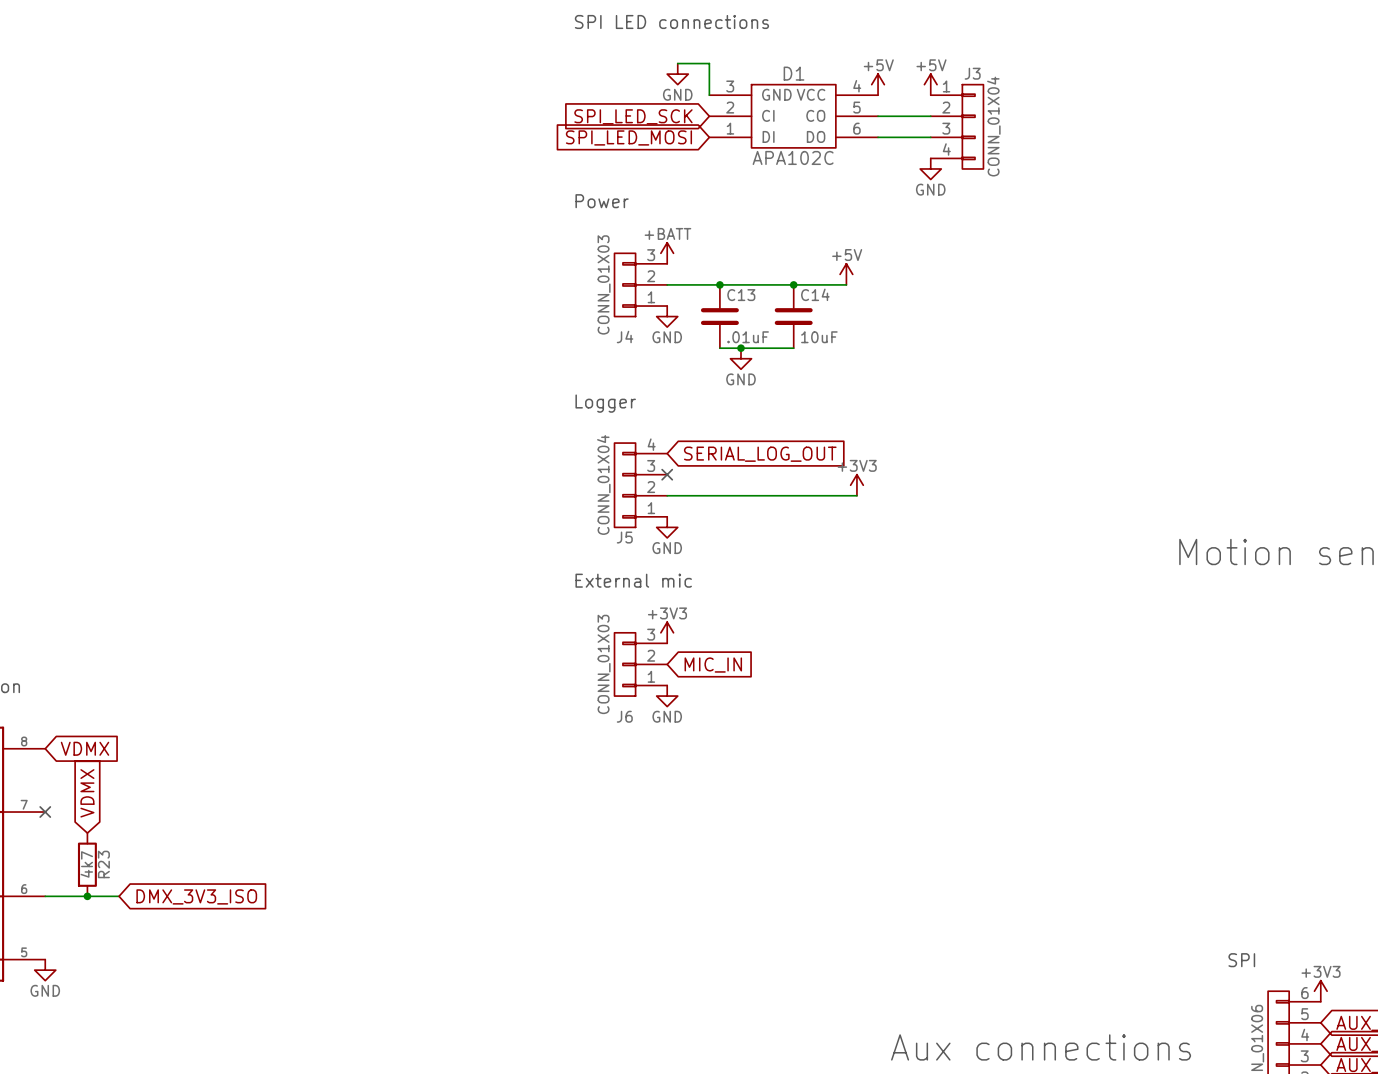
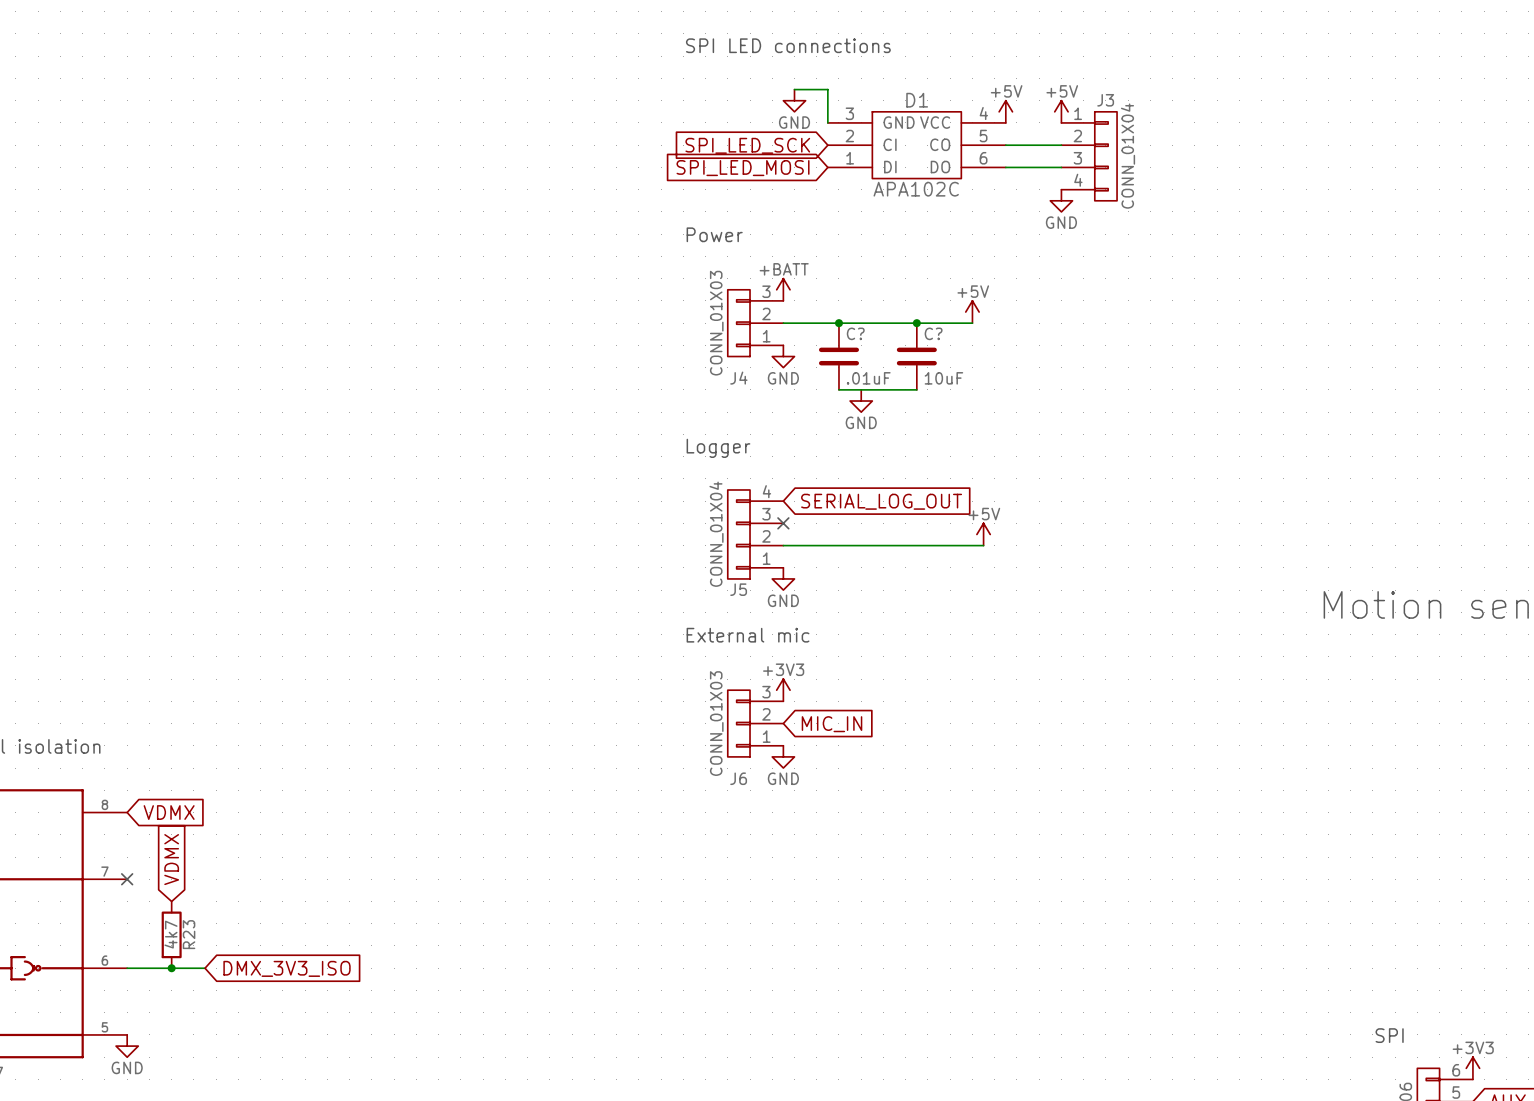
C14 name: C14 (815, 294) -> C? (933, 333)
C13 name: C13 (741, 295) -> C? (855, 333)
junction: (741, 348) -> none
power symbol: +3V3 (856, 485) -> +5V (983, 534)

